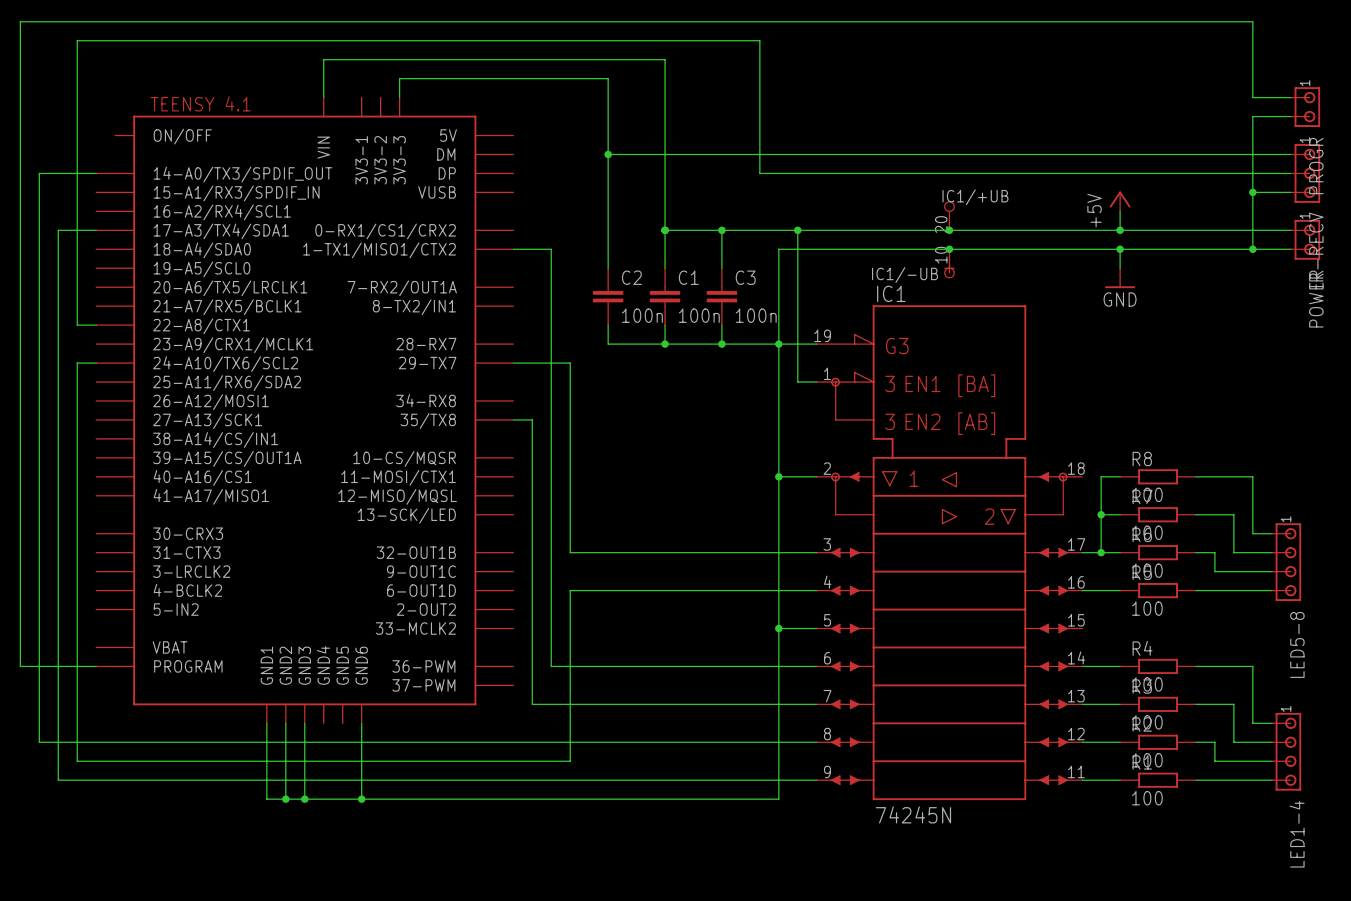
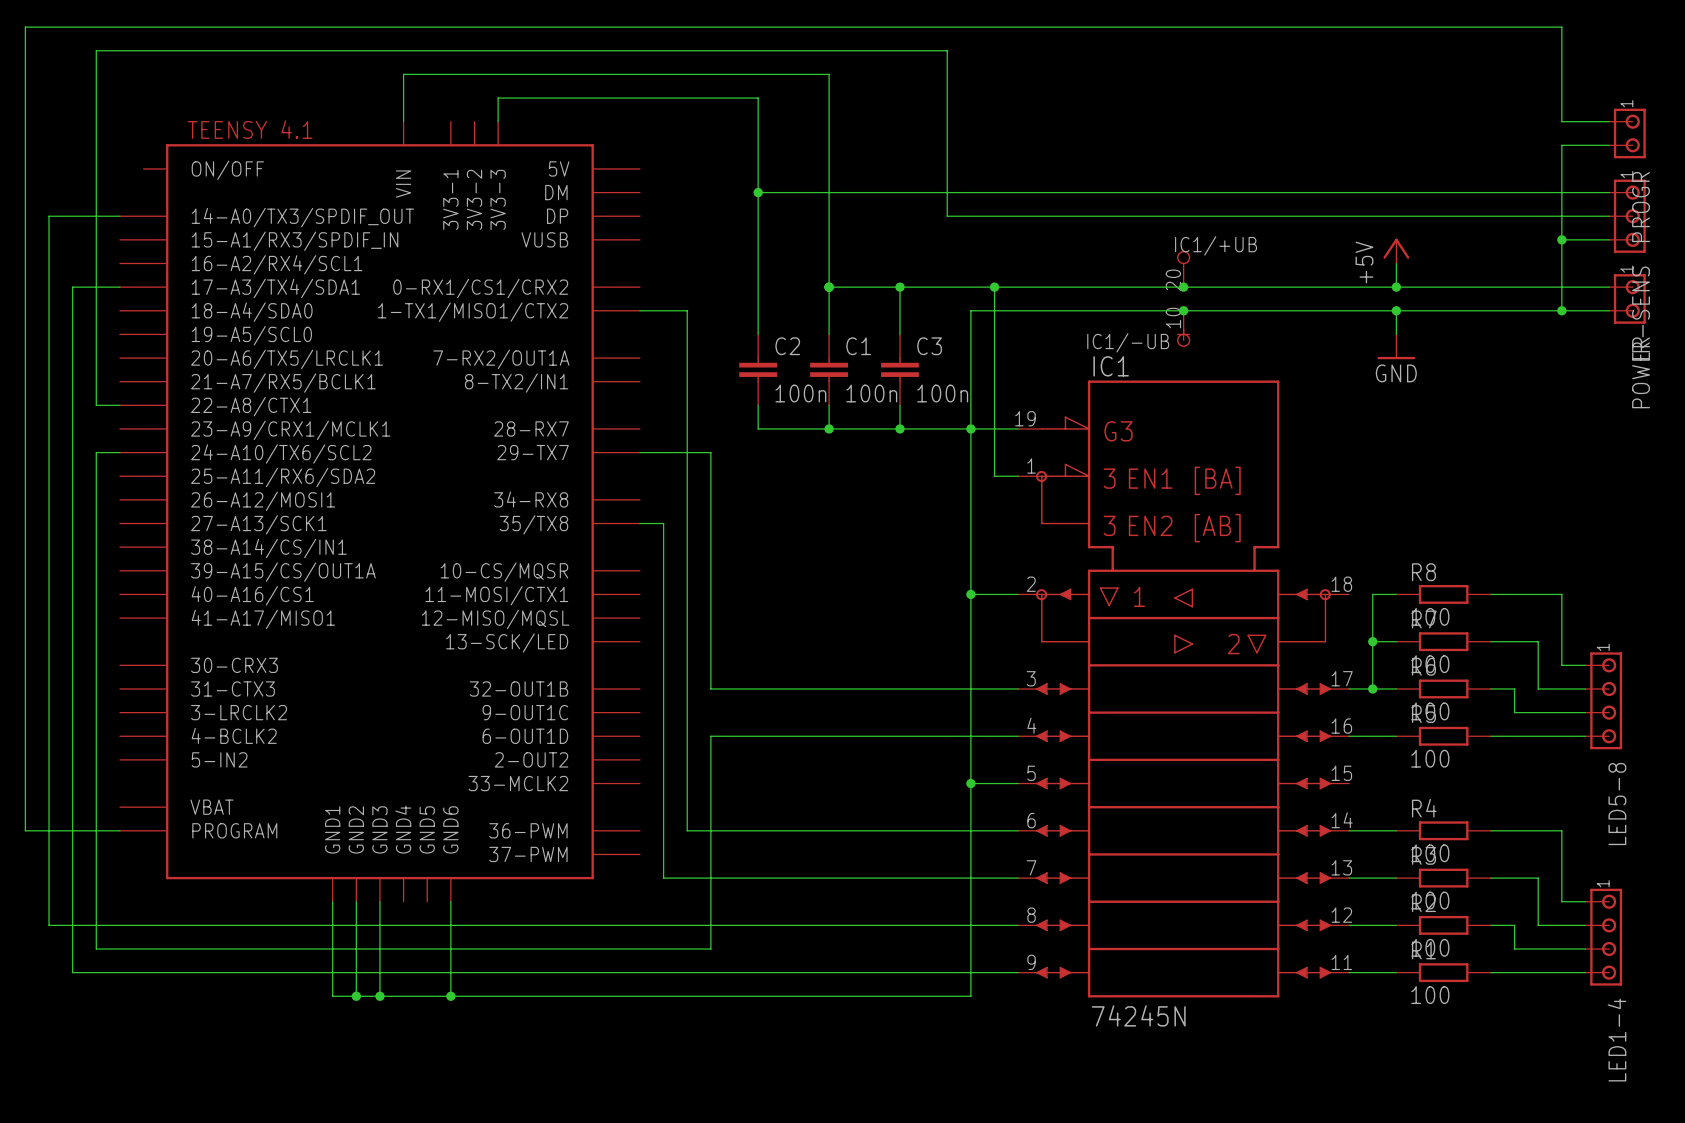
IR-RECV name: IR-RECV (1316, 249) -> IR-SENS (1641, 312)

